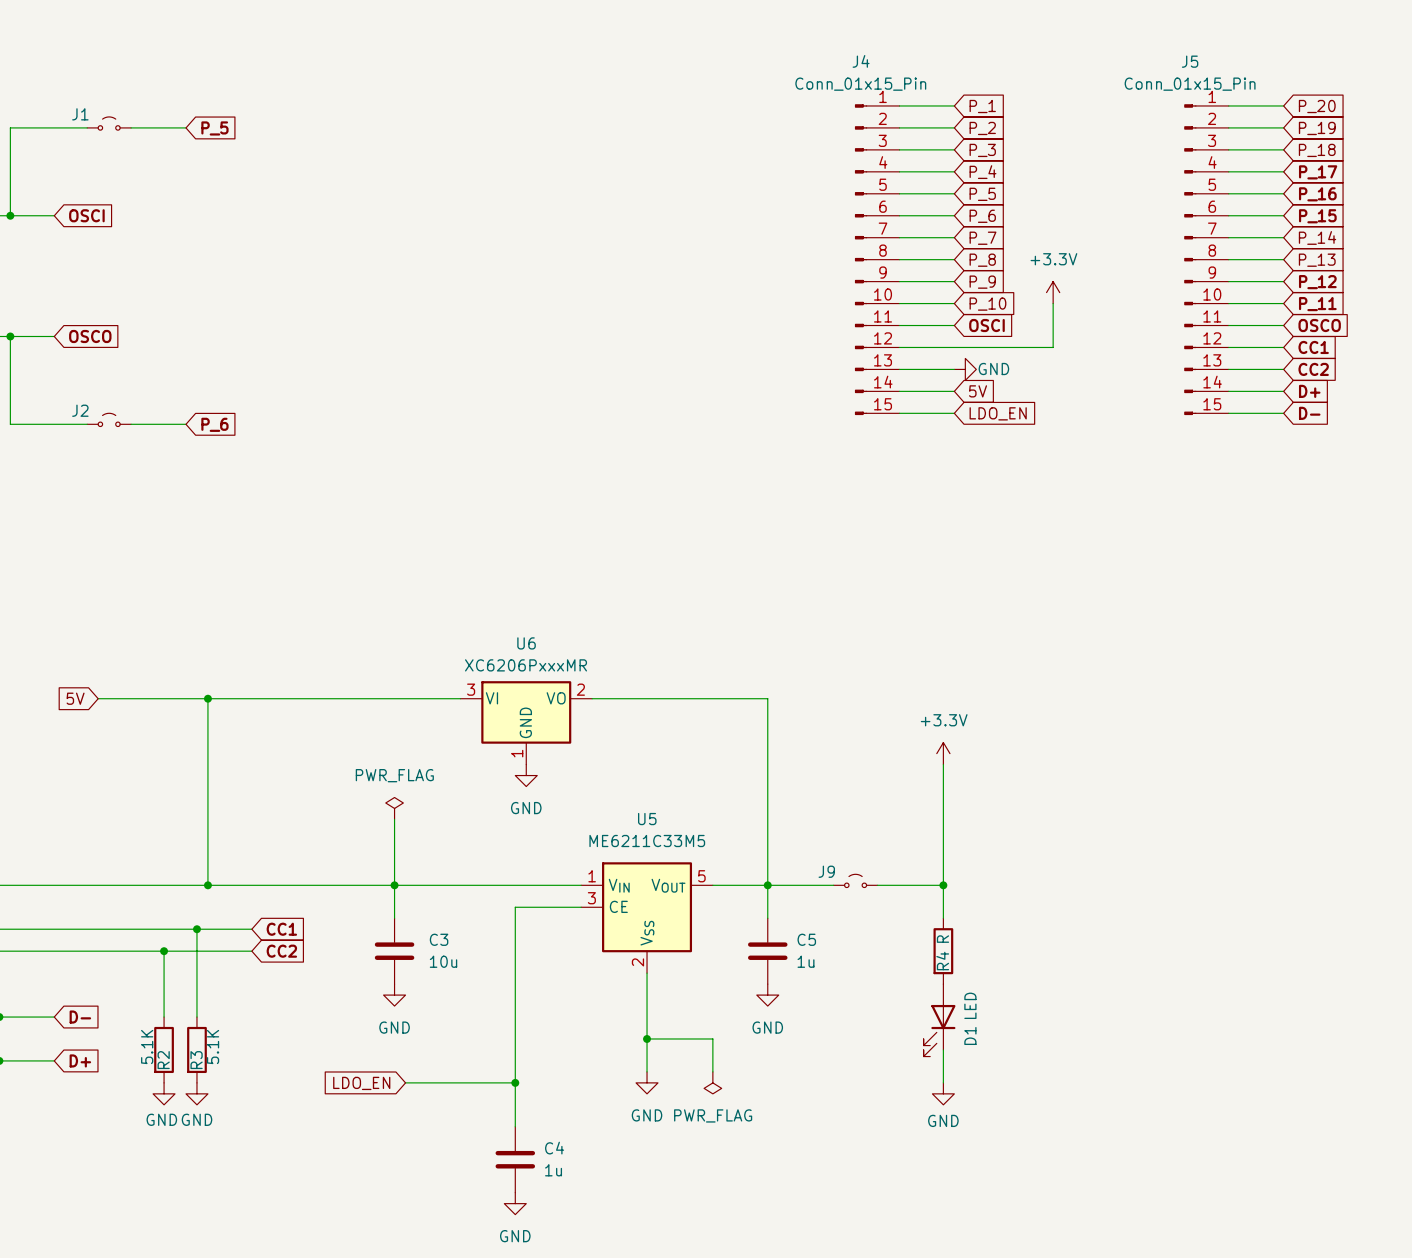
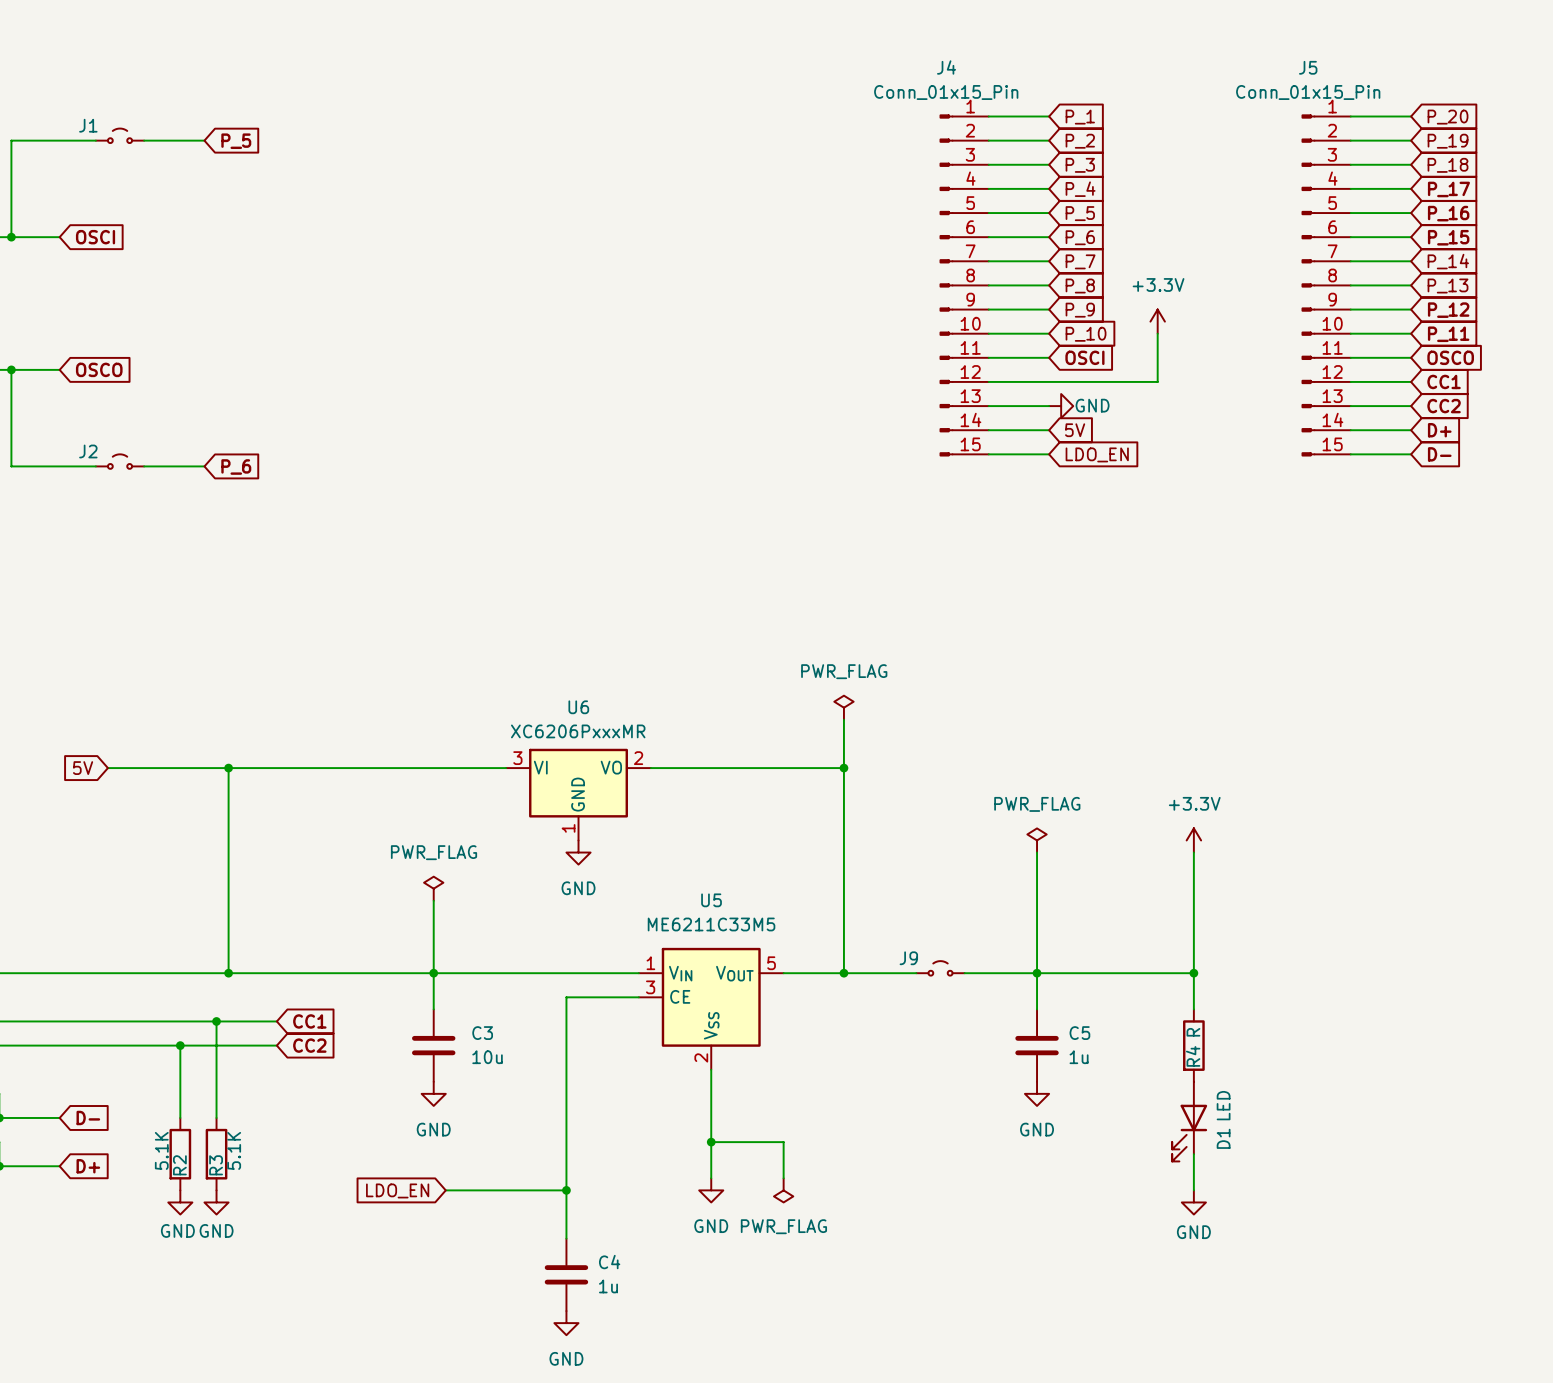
power symbol: none -> PWR_FLAG (843, 707)
wire: none -> (843, 719) (843, 768)
junction: none -> (843, 768)
power symbol position: +3.3V (943, 753) -> +3.3V (1193, 840)
power symbol: none -> PWR_FLAG (1037, 840)
wire: none -> (1193, 852) (1193, 1009)
wire: (767, 885) (767, 918) -> none
wire: none -> (1037, 973) (1193, 973)
junction: none -> (1193, 973)
C5 position: (767, 951) -> (1037, 1045)
R4 position: (943, 951) -> (1193, 1045)
power symbol: GND (767, 995) -> none
power symbol: none -> GND (1037, 1093)
D1 position: (939, 1020) -> (1189, 1121)
wire: (943, 1049) (943, 1082) -> (1193, 1154) (1193, 1190)
power symbol: GND (943, 1093) -> none
power symbol: none -> GND (1193, 1202)

